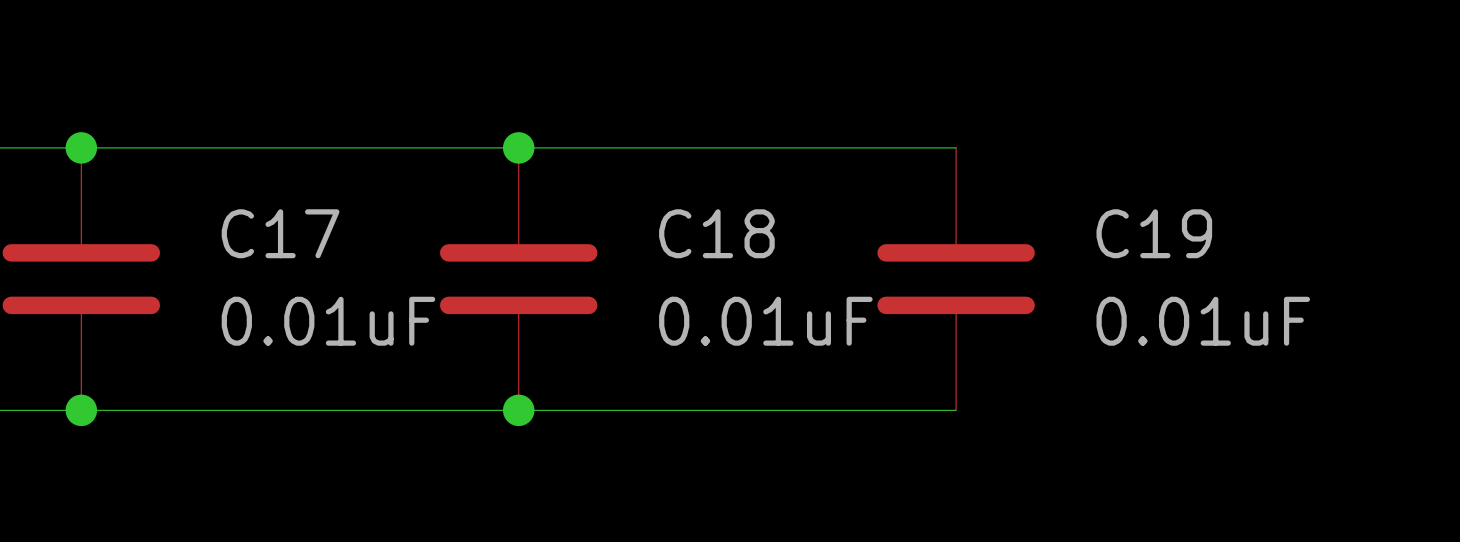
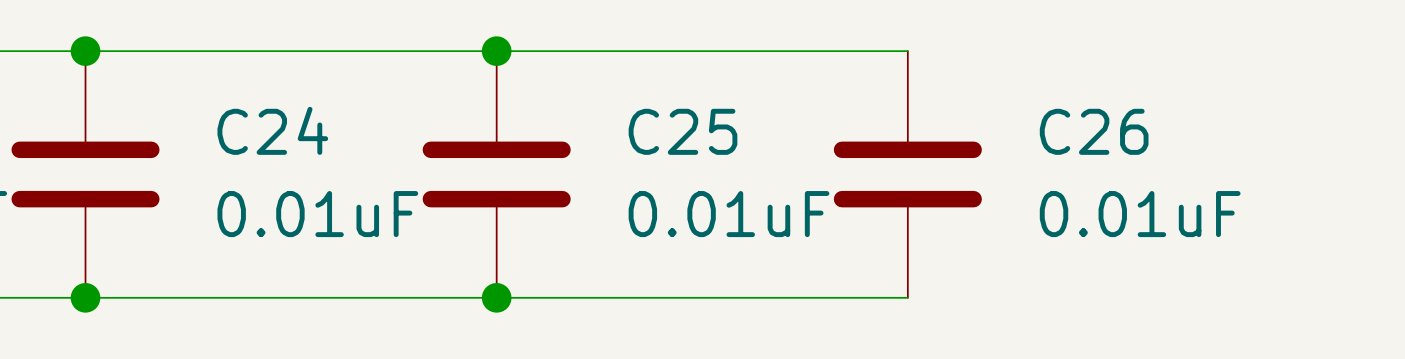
C17 name: C17 (280, 233) -> C24 (272, 130)
C18 name: C18 (716, 233) -> C25 (682, 131)
C19 name: C19 (1154, 233) -> C26 (1094, 131)

